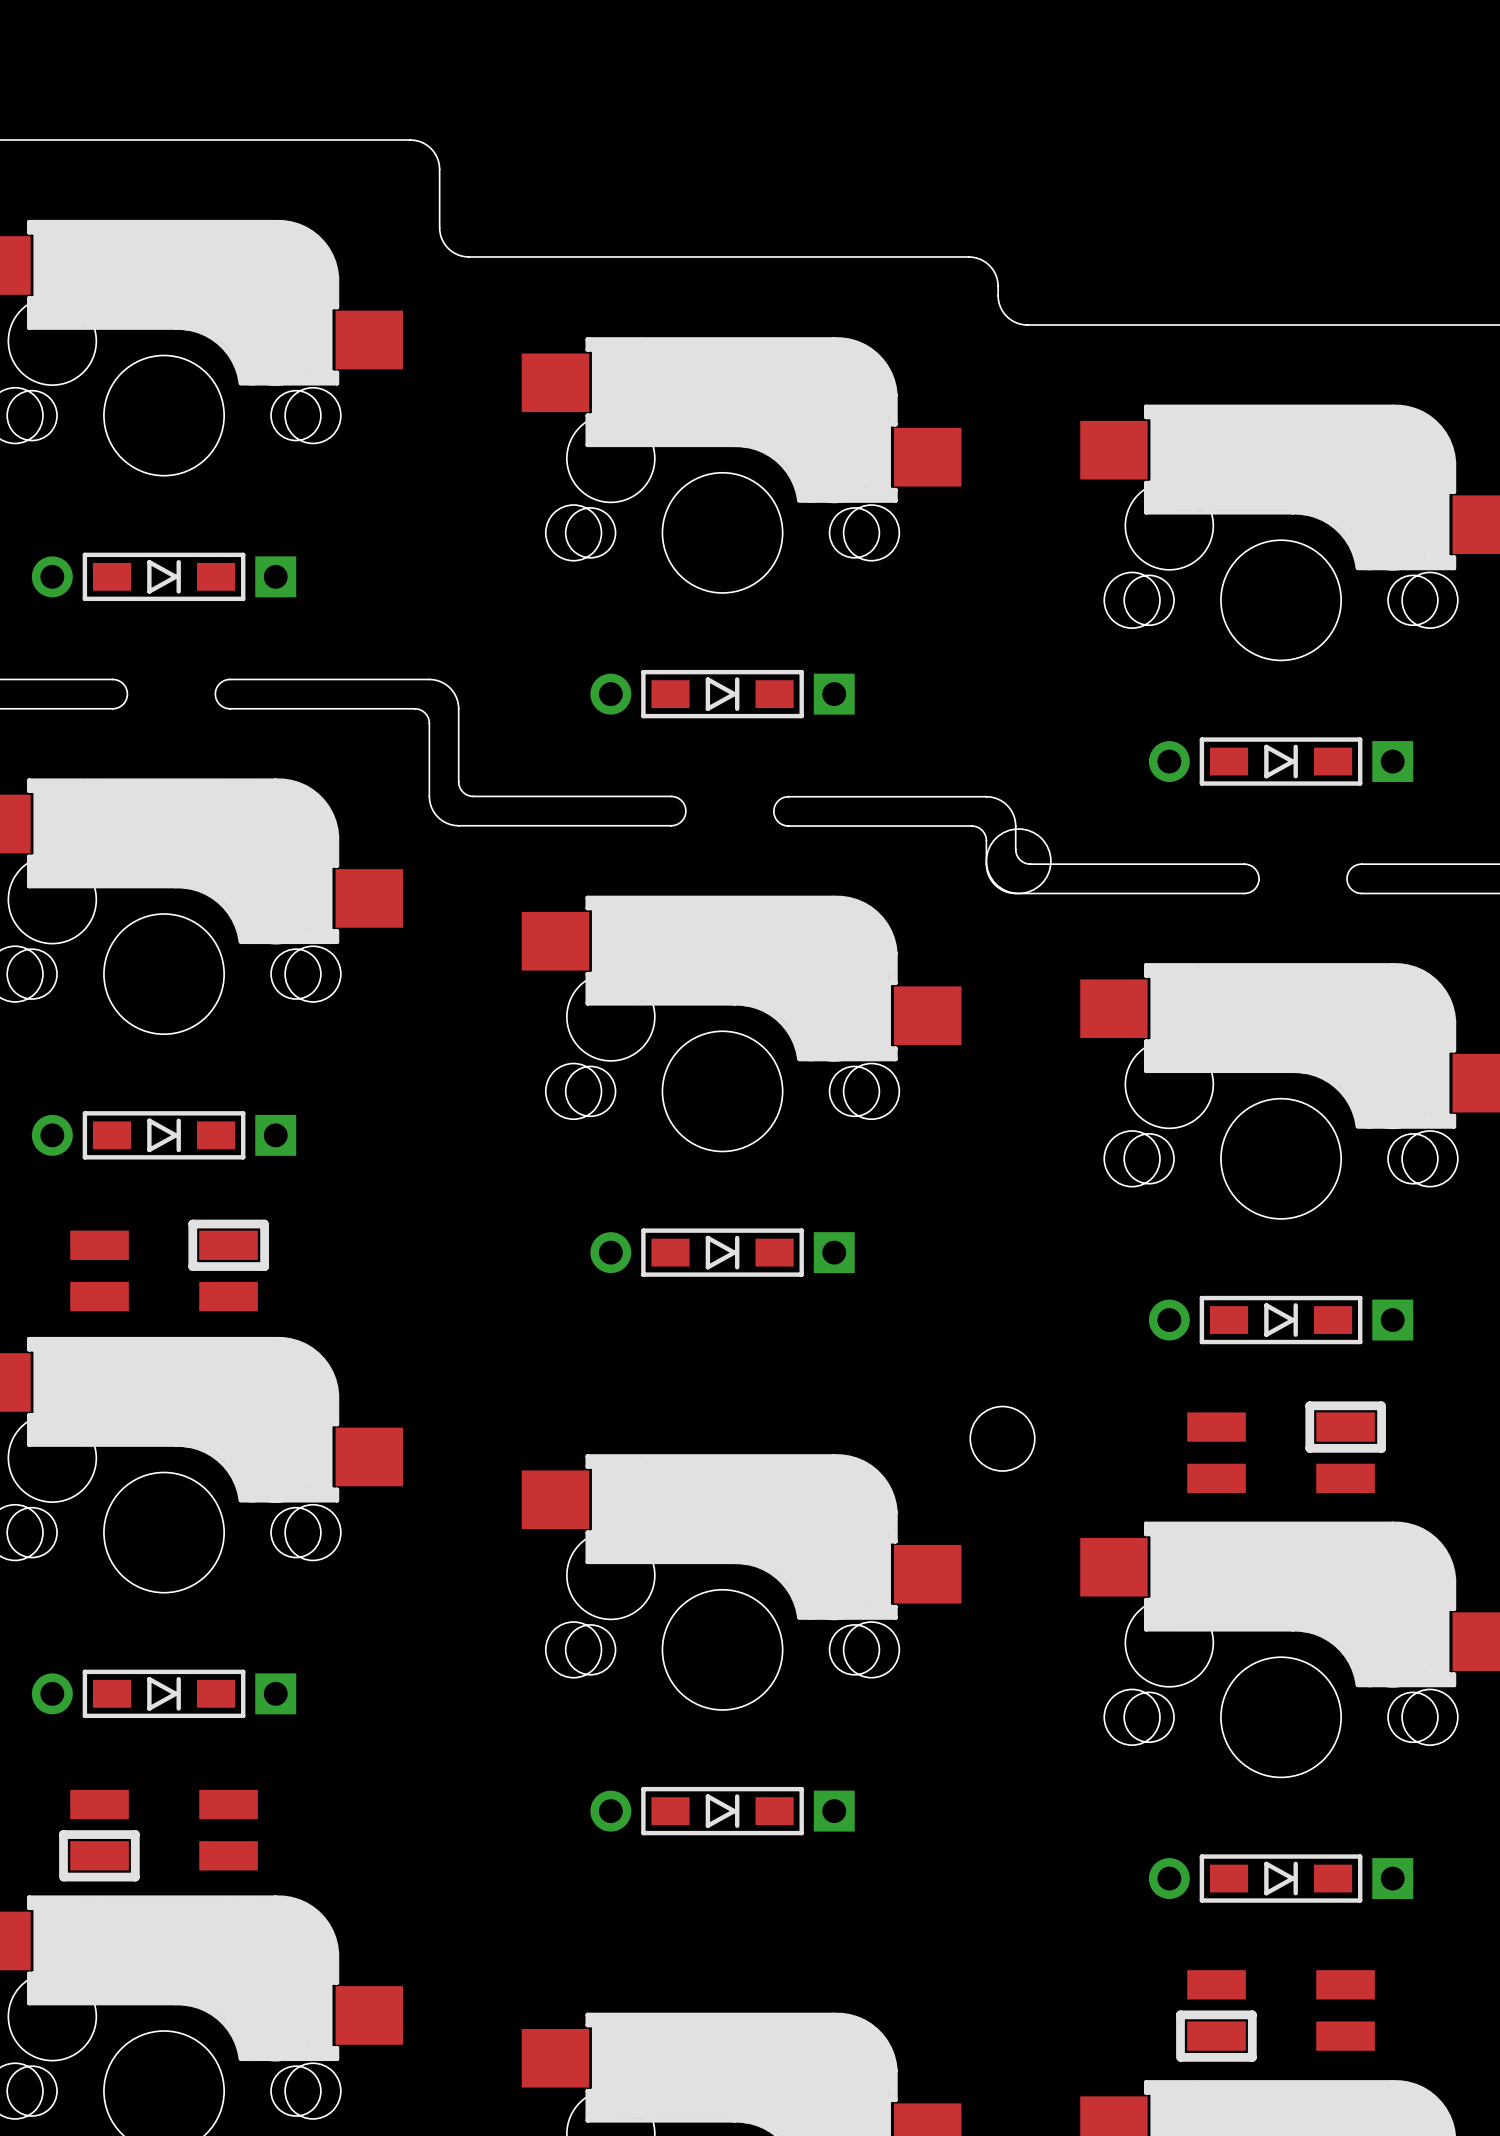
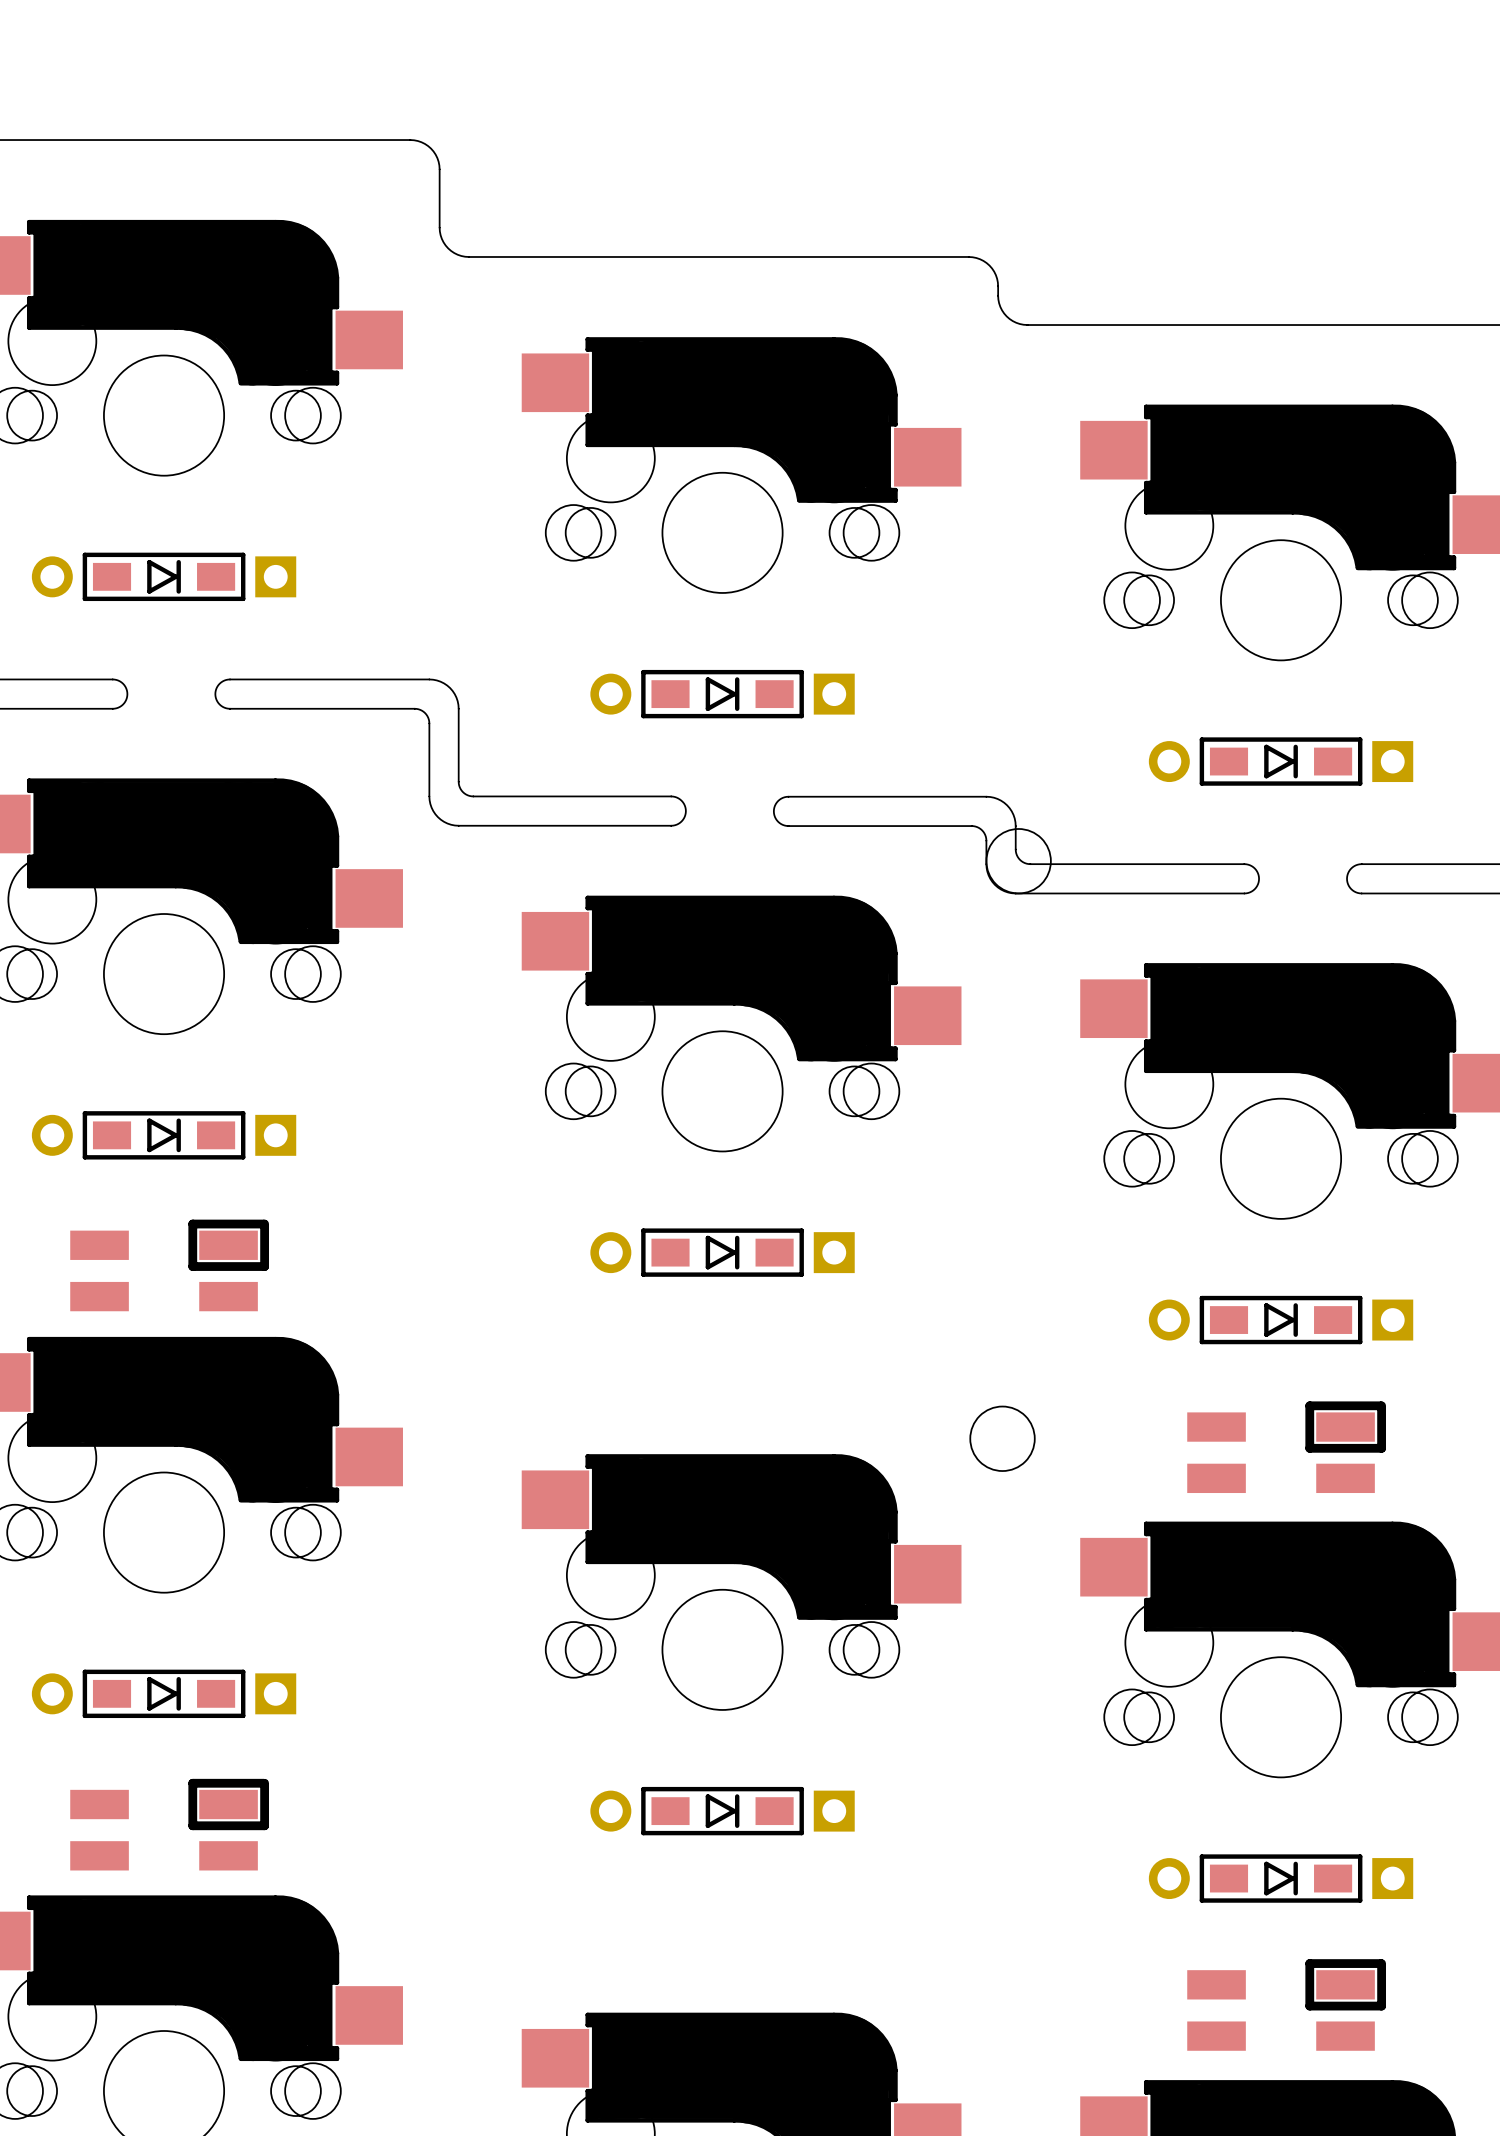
part rotation: 0° (158, 1835) -> 180° (169, 1824)
part rotation: 0° (1275, 2015) -> 180° (1286, 2004)

